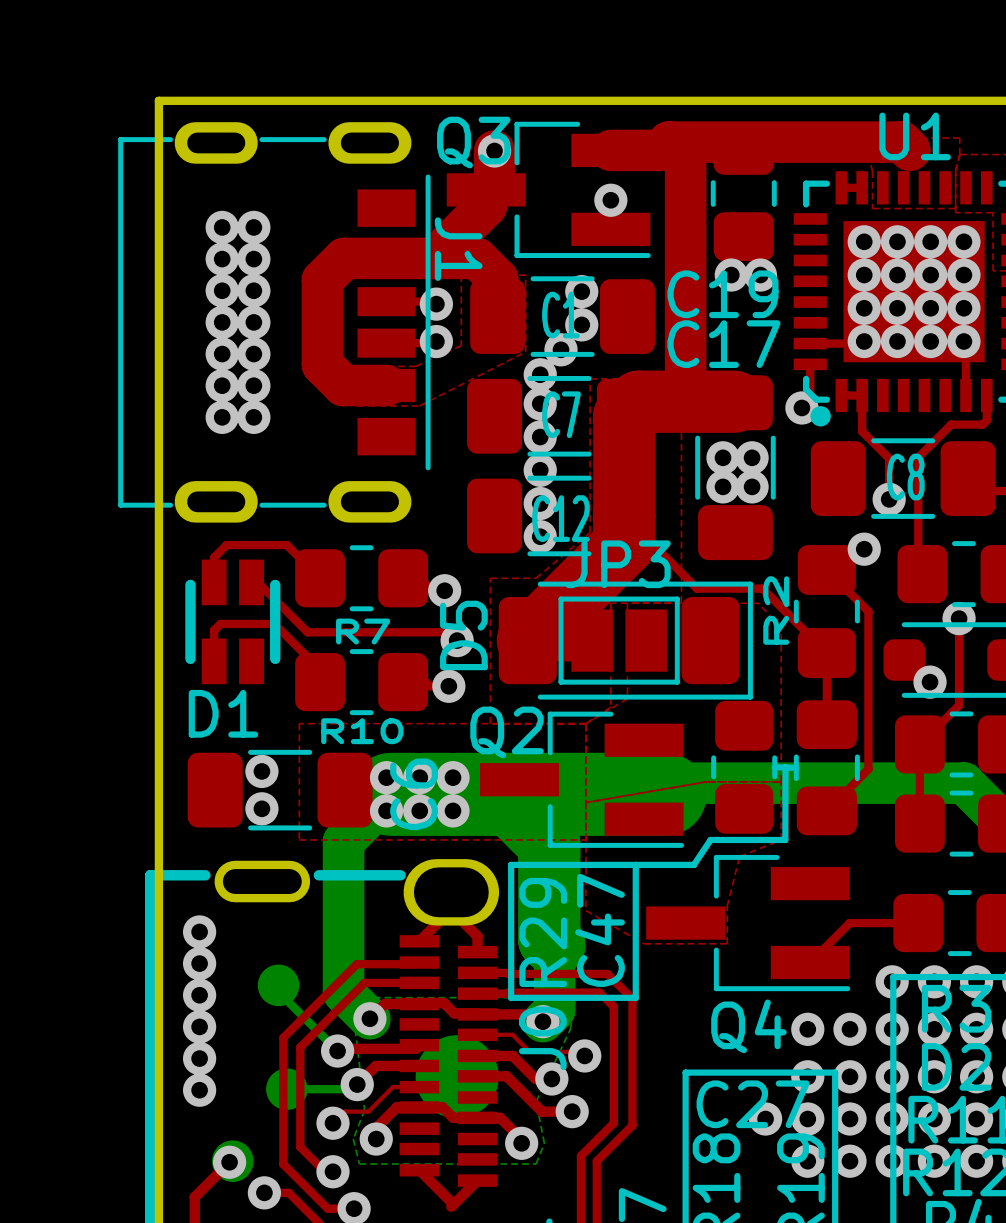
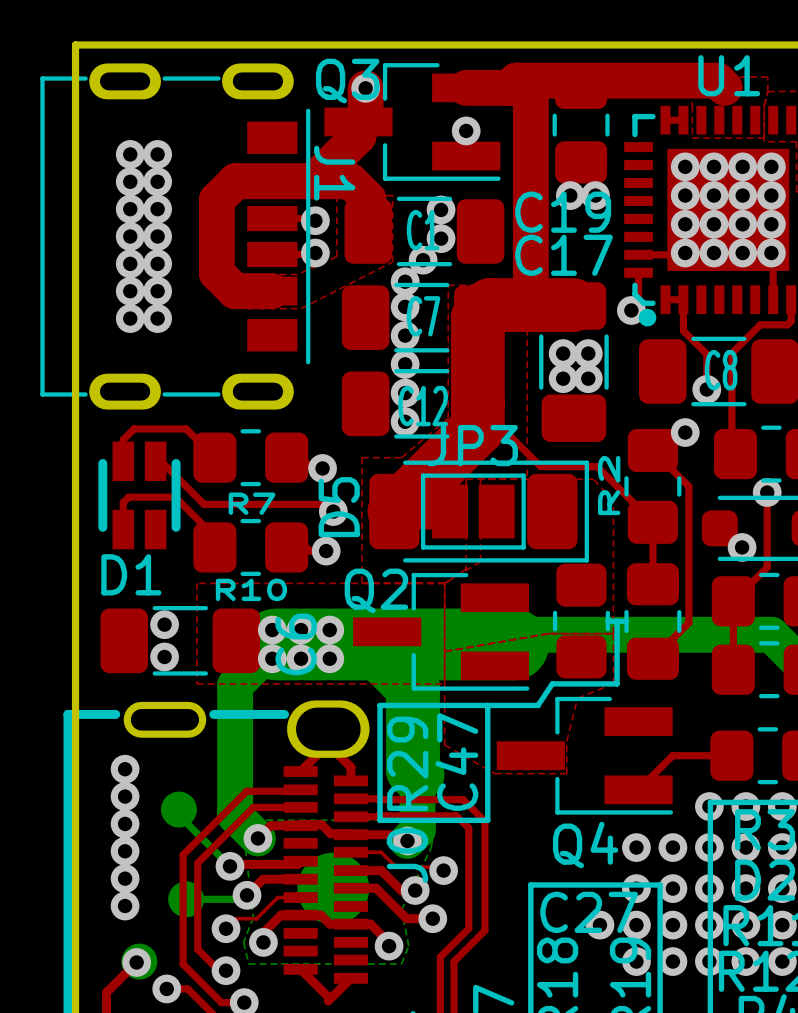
via: (199, 931) -> none
via: none -> (125, 769)
via: (199, 963) -> none
via: none -> (125, 796)
via: (199, 995) -> none
via: none -> (125, 823)
via: (199, 1026) -> none
via: none -> (125, 851)
via: (199, 1058) -> none
via: none -> (125, 878)
via: (199, 1090) -> none
via: none -> (125, 906)

